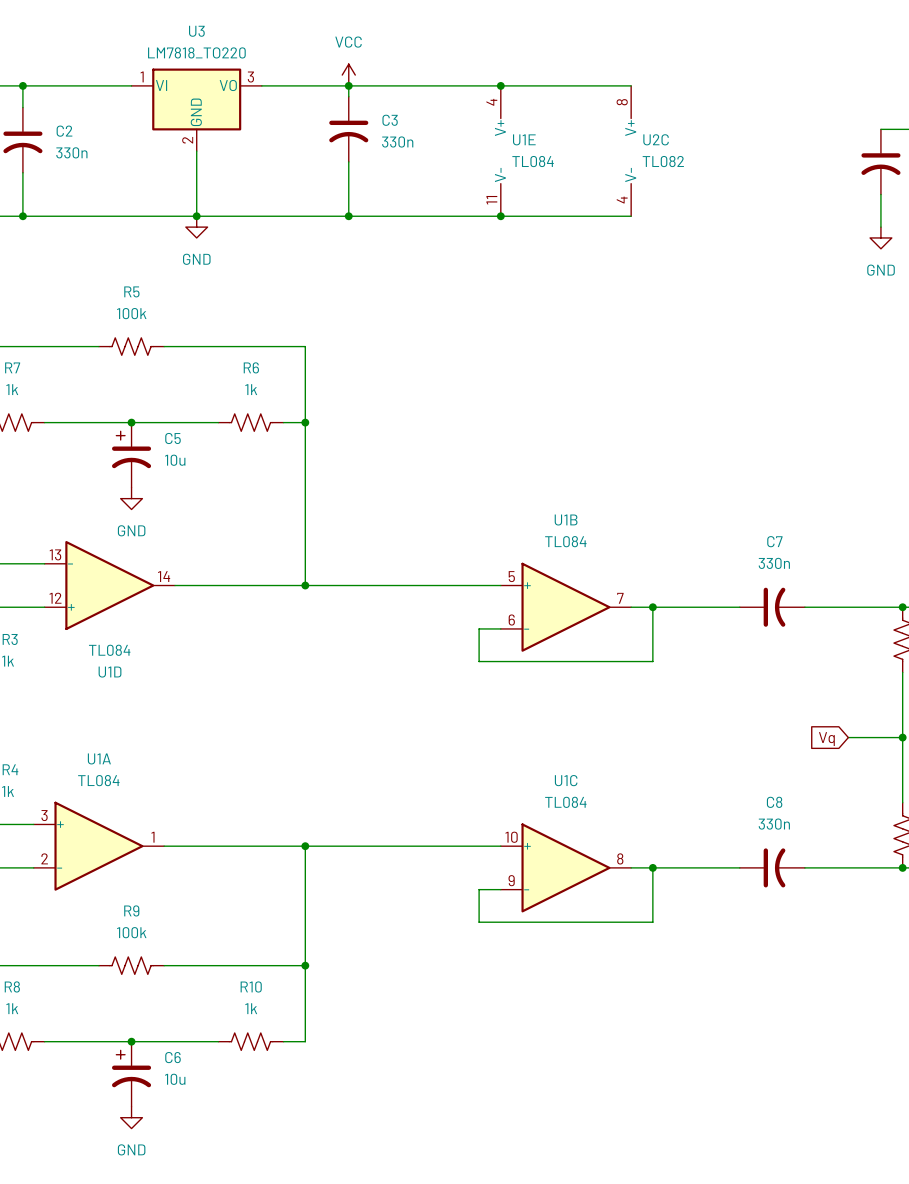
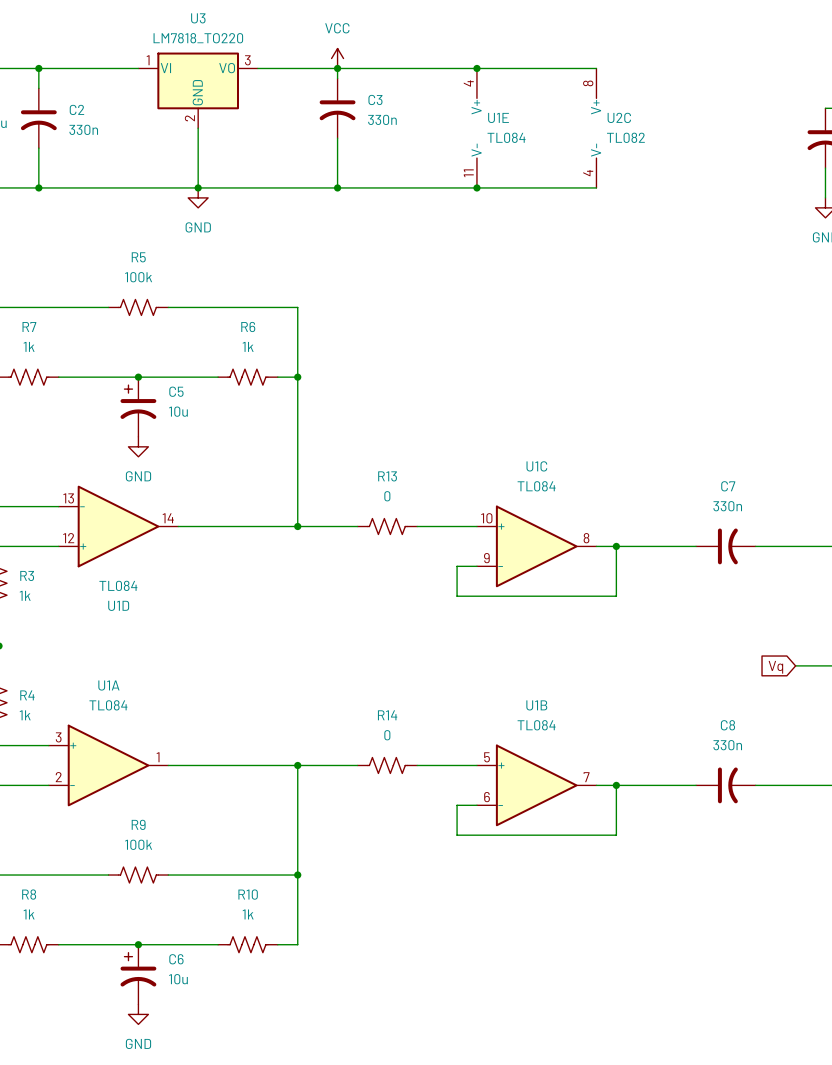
R13: none -> 0 (387, 526)
U1B position: (565, 607) -> (536, 785)
R14: none -> 0 (387, 765)
U1C position: (565, 867) -> (536, 546)

